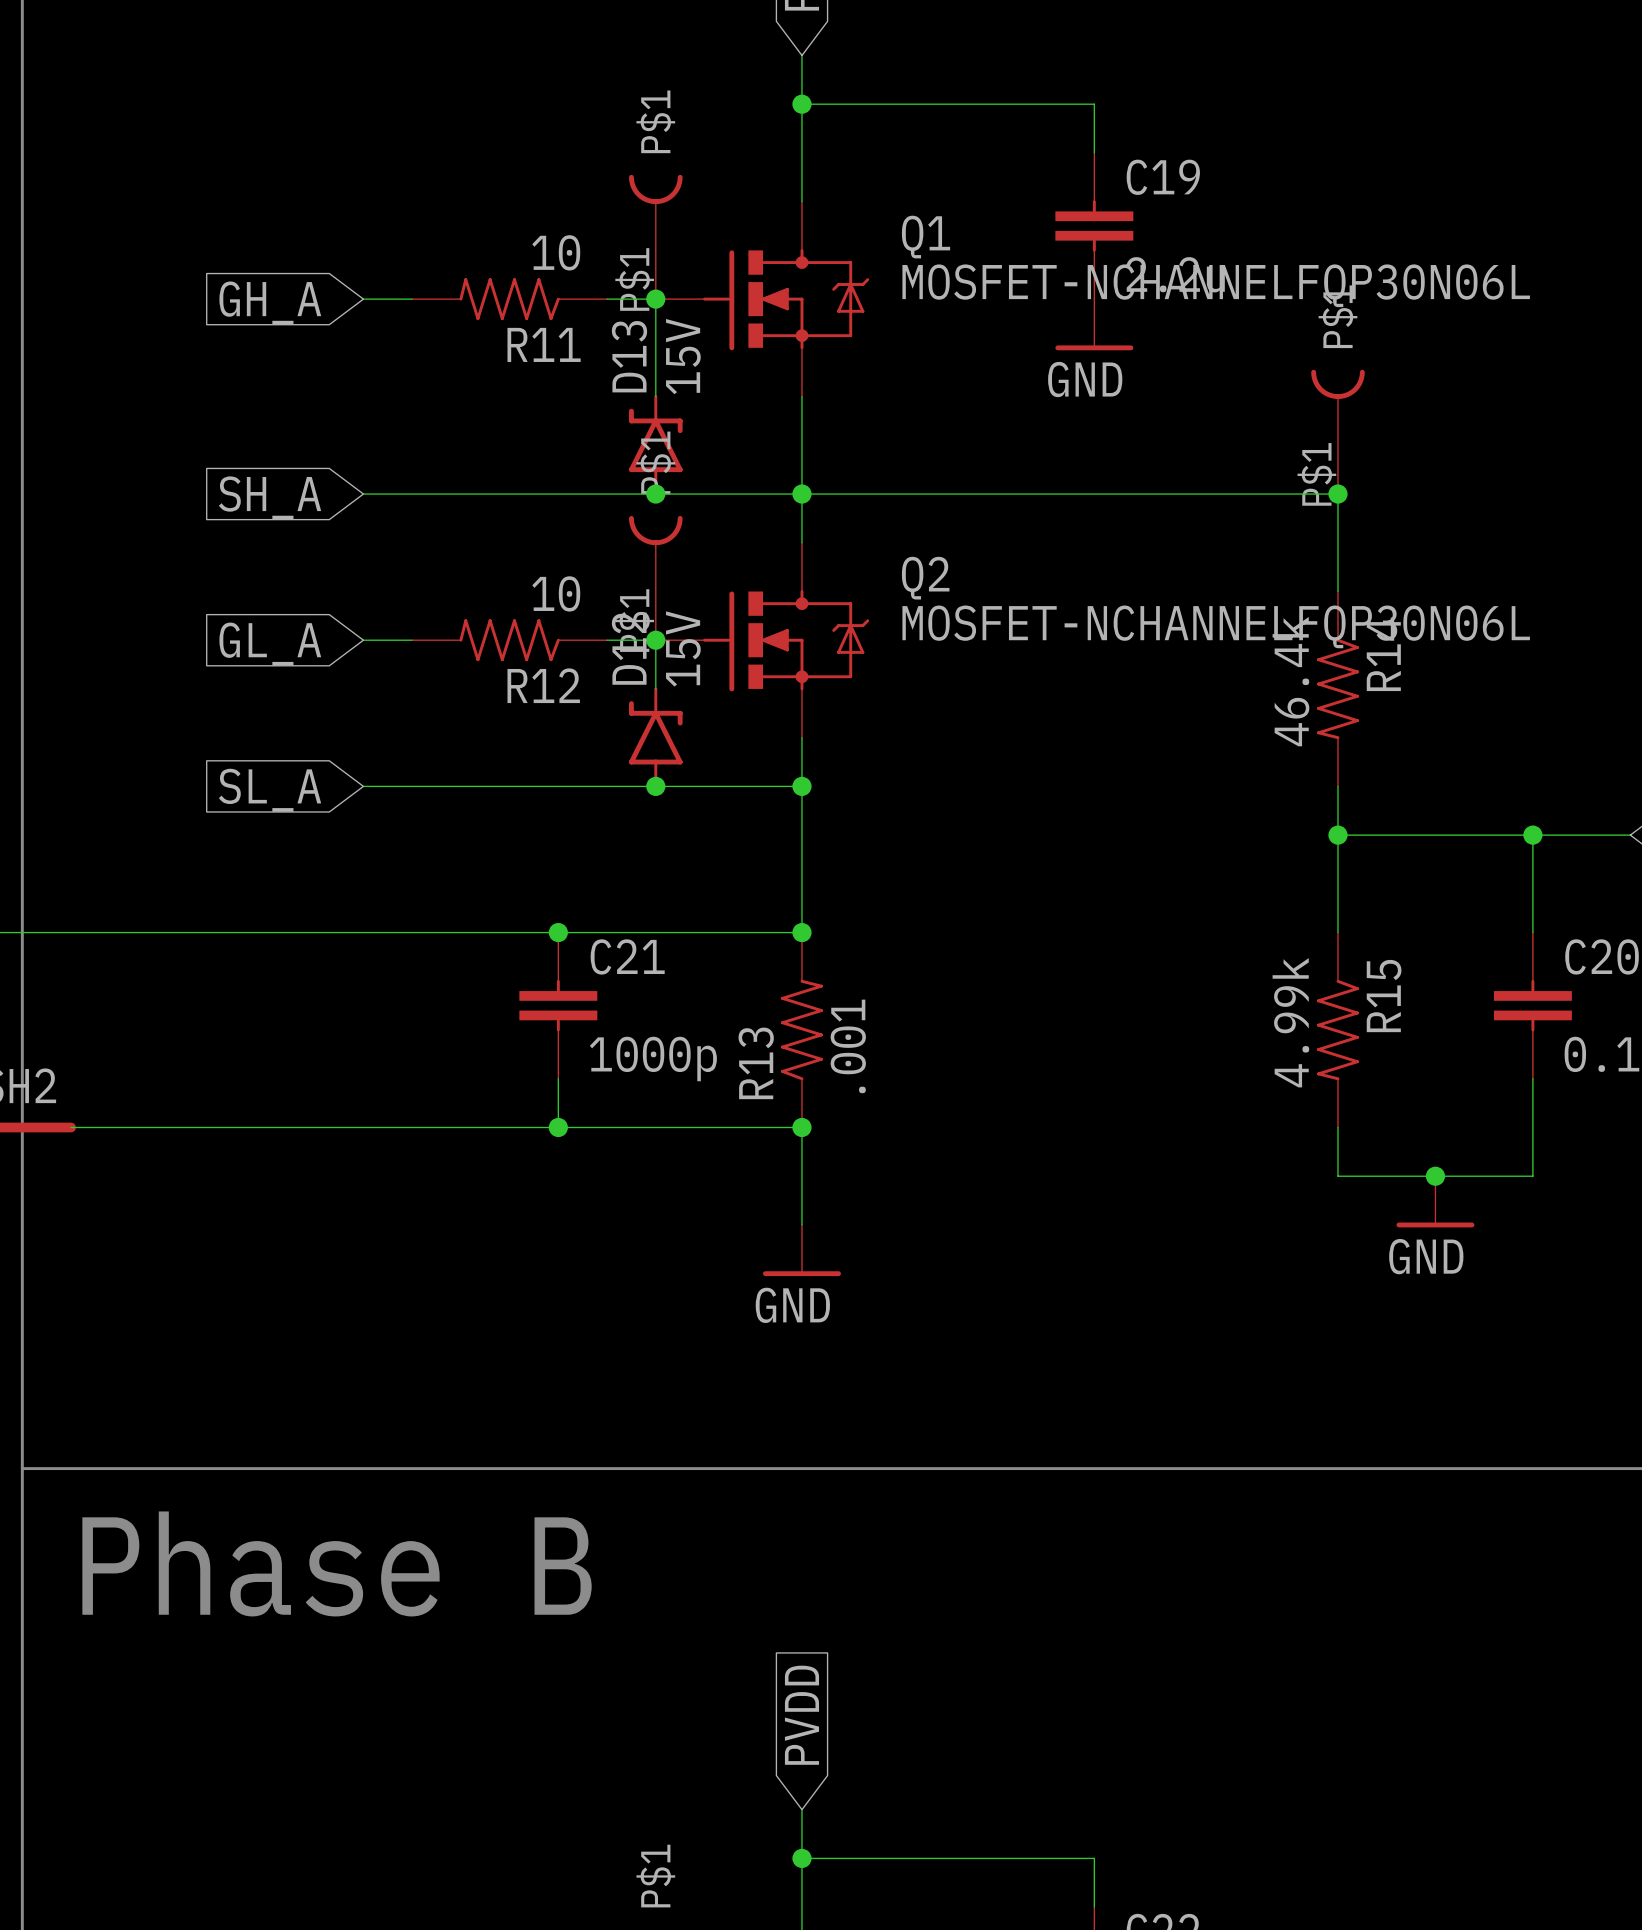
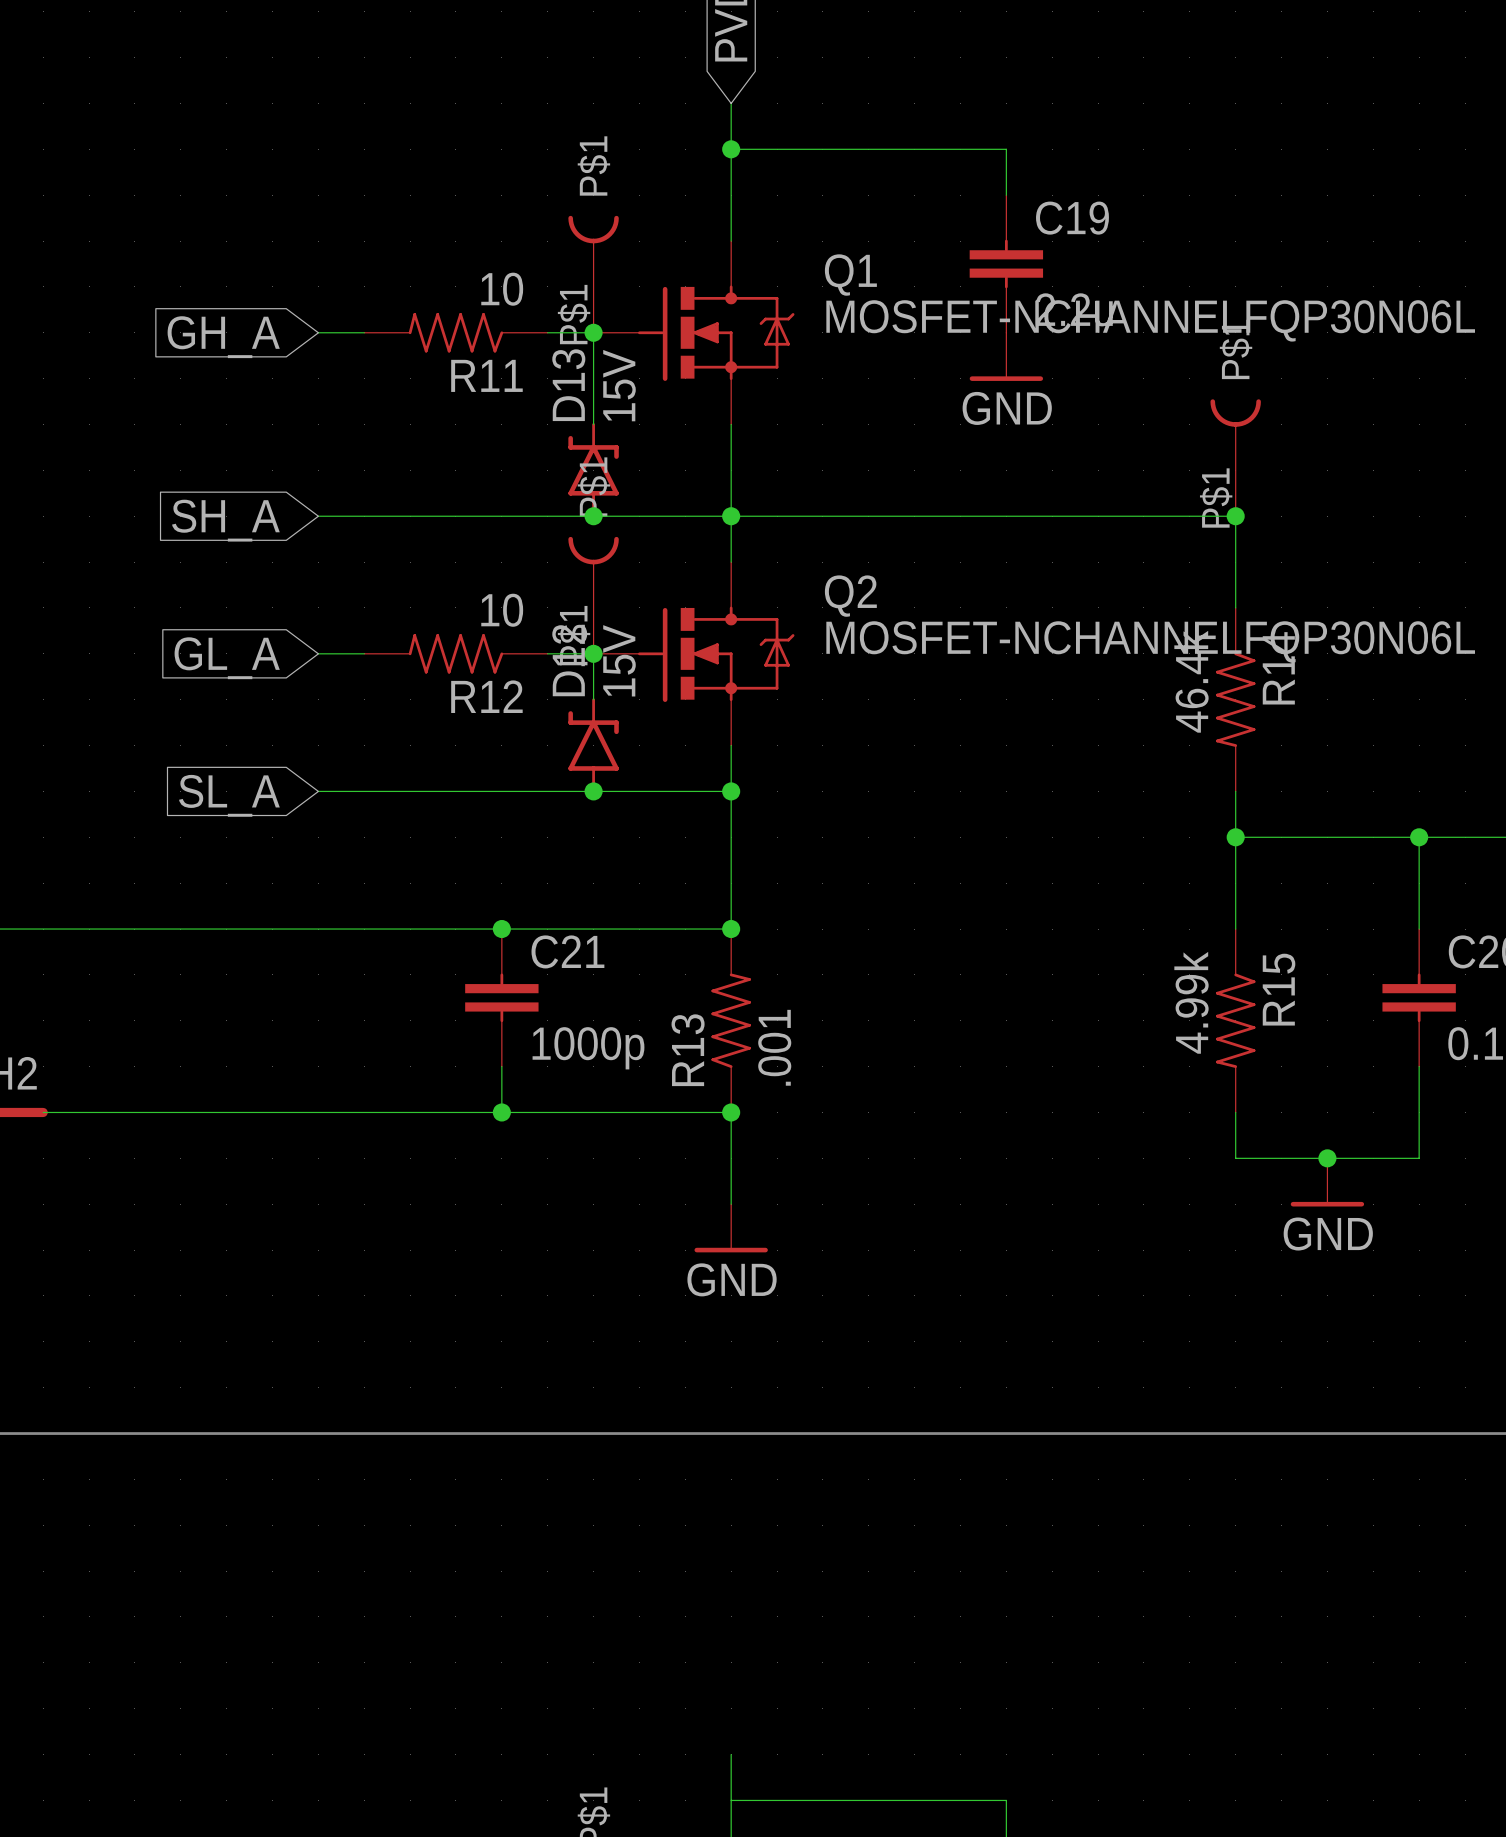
text: Phase B (337, 1563) -> none
global label: PVDD (801, 1715) -> none
junction: (801, 1858) -> none

